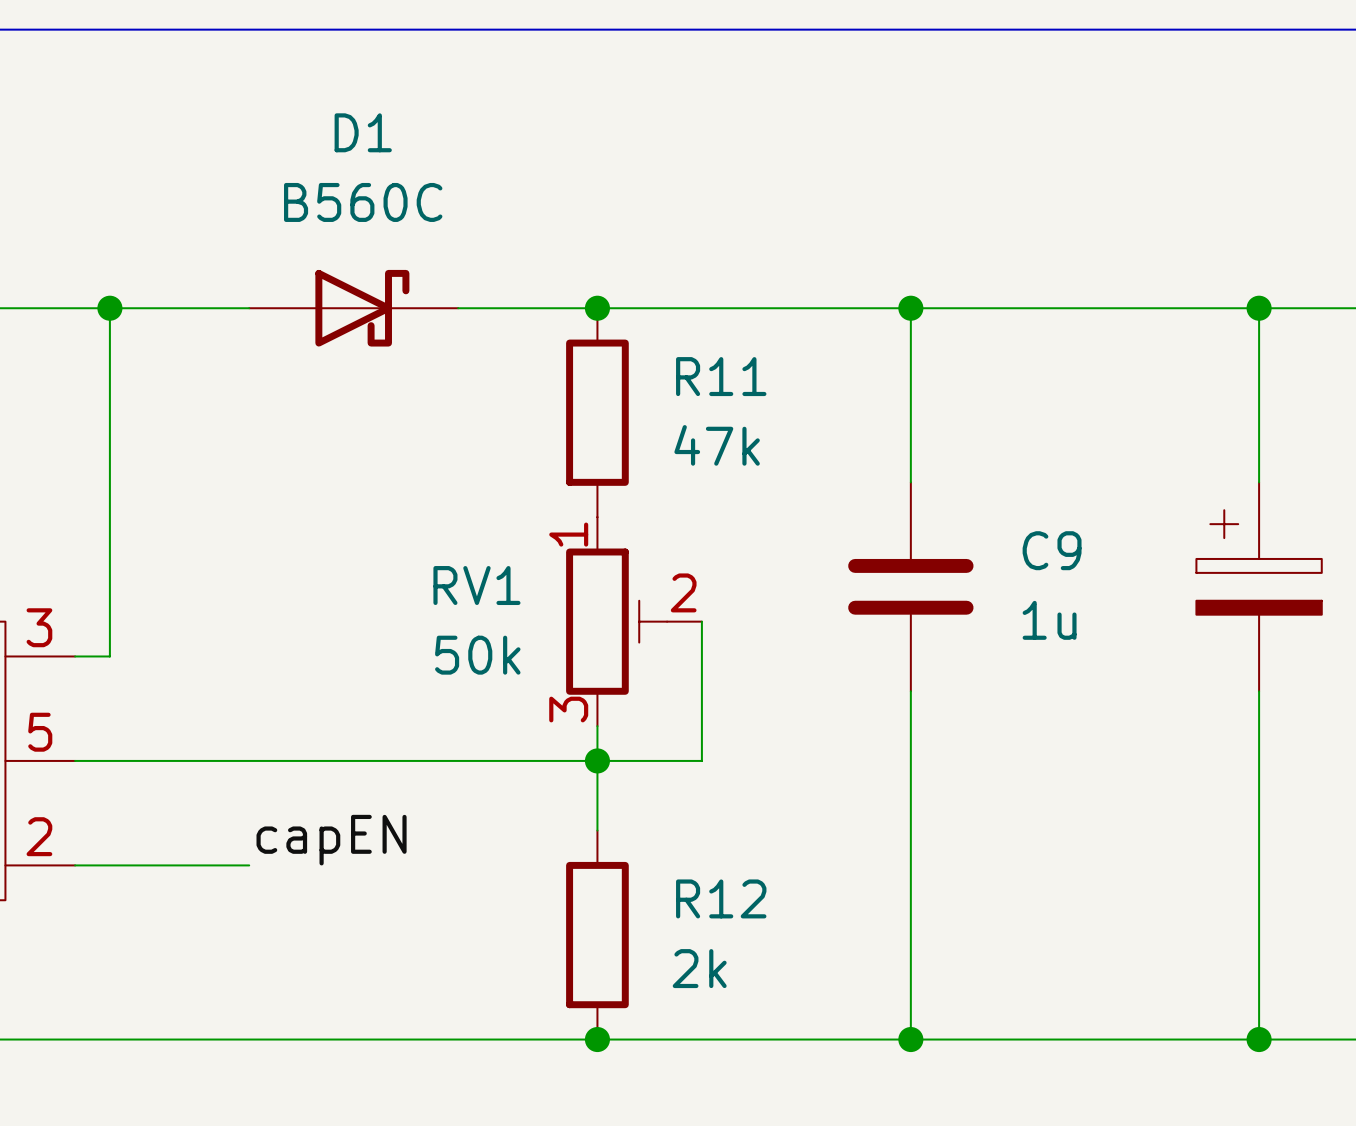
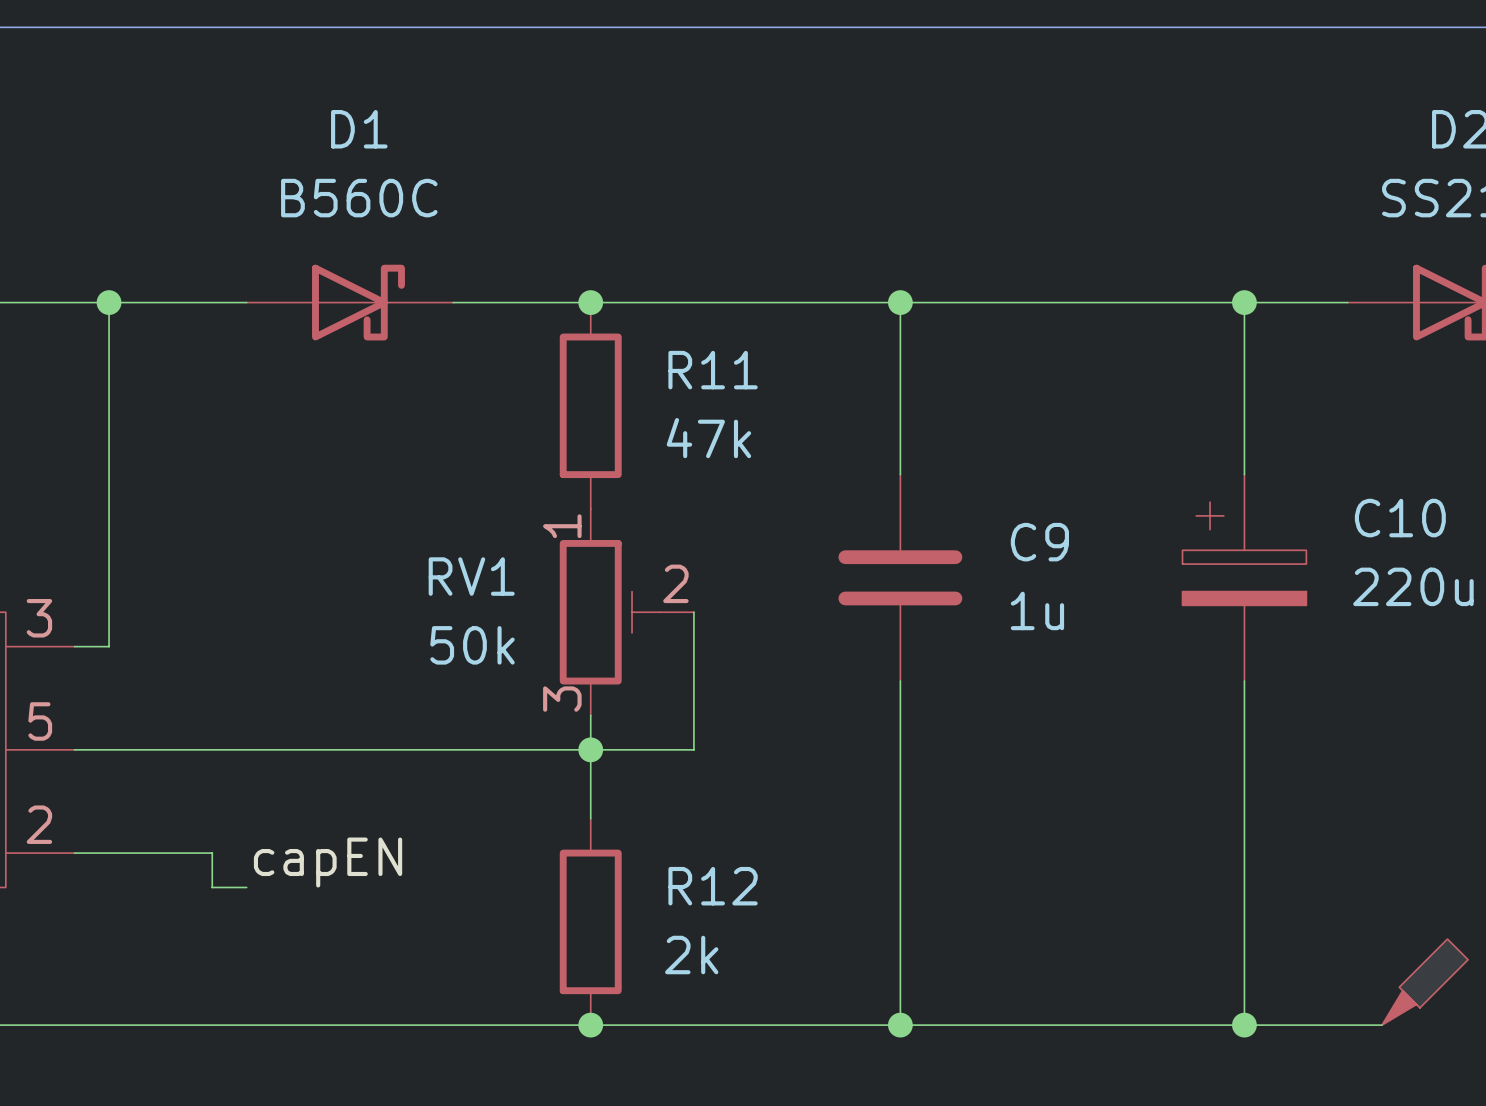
label position: capEN (331, 840) -> capEN (328, 862)
wire: (214, 865) (249, 865) -> (212, 853) (212, 887) (246, 887)

